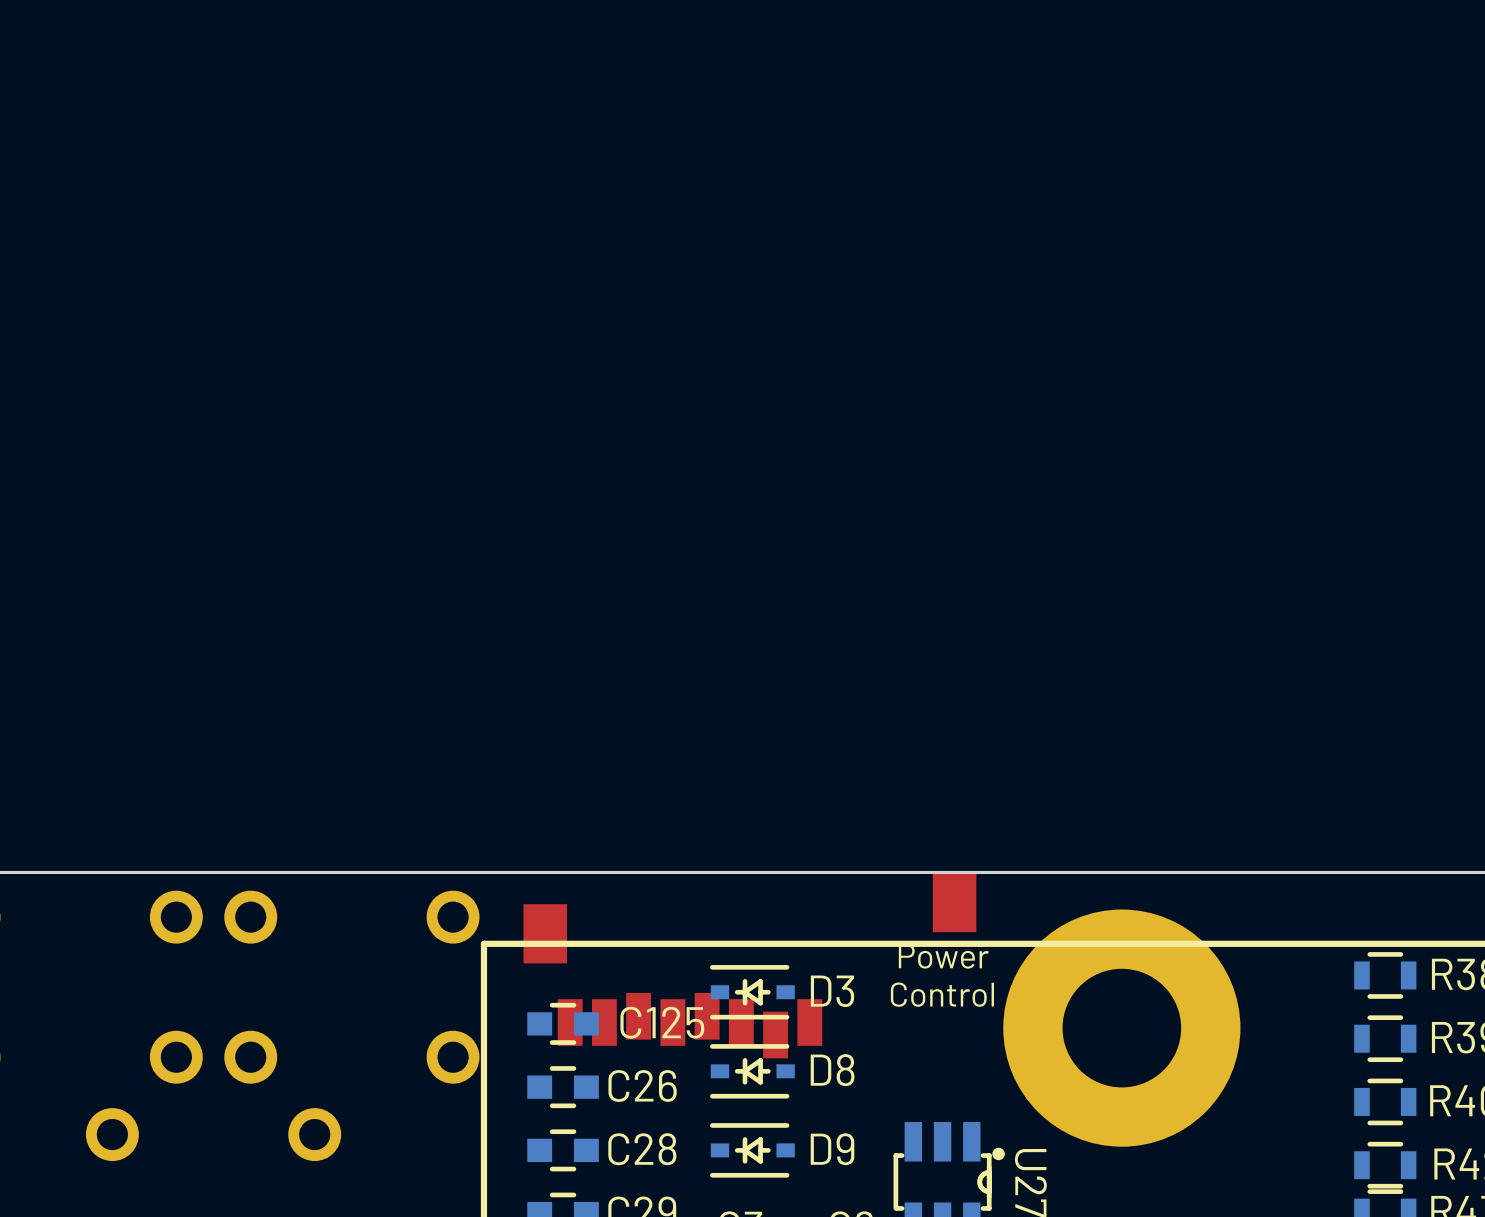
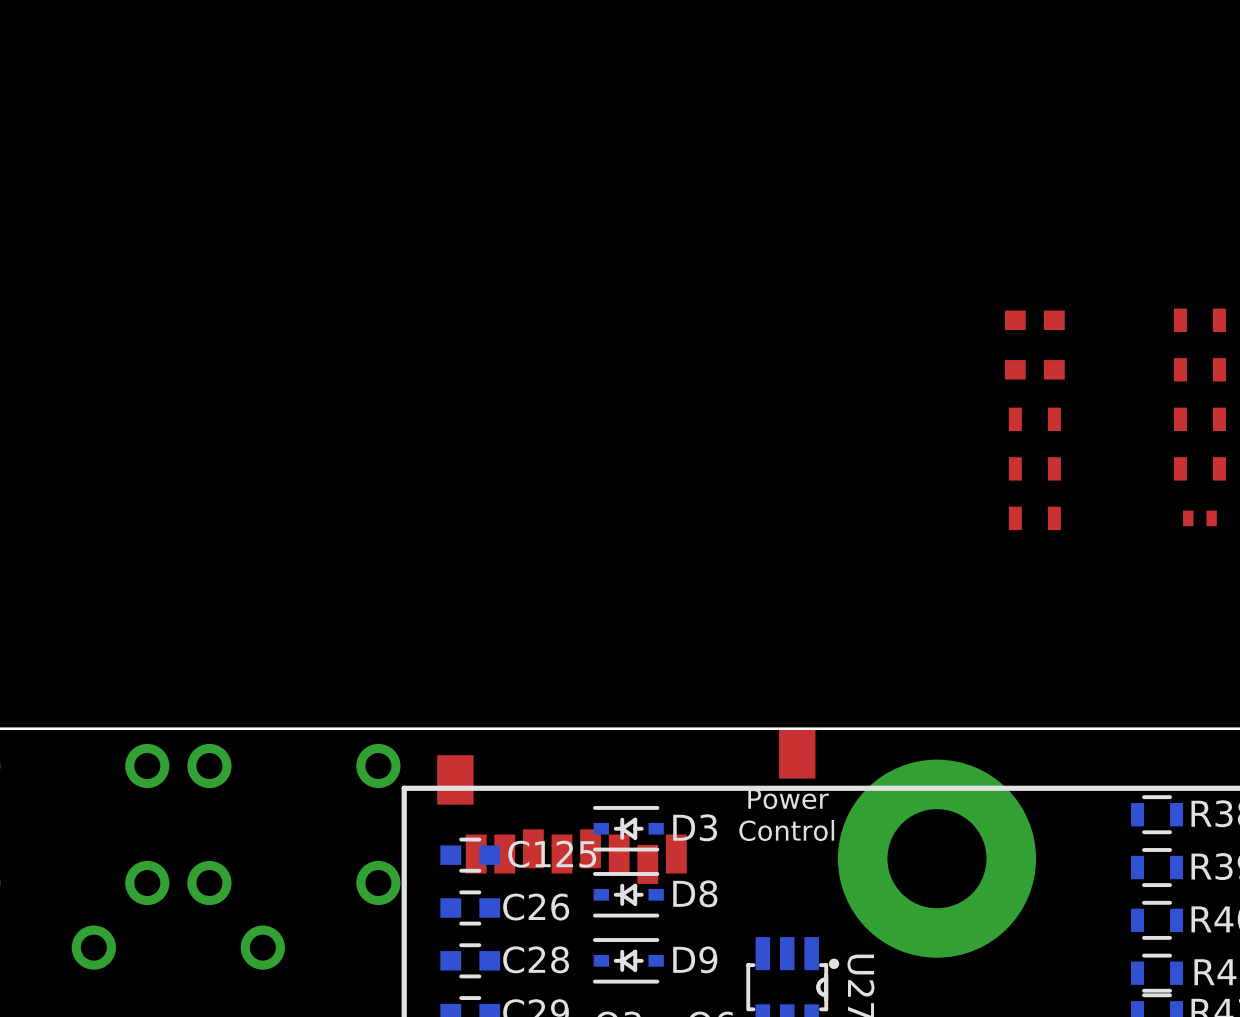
part: none -> (1034, 320)
part: none -> (1199, 320)
part: none -> (1034, 369)
part: none -> (1199, 369)
part: none -> (1034, 419)
part: none -> (1199, 419)
part: none -> (1034, 468)
part: none -> (1199, 468)
part: none -> (1034, 518)
part: none -> (1199, 518)

